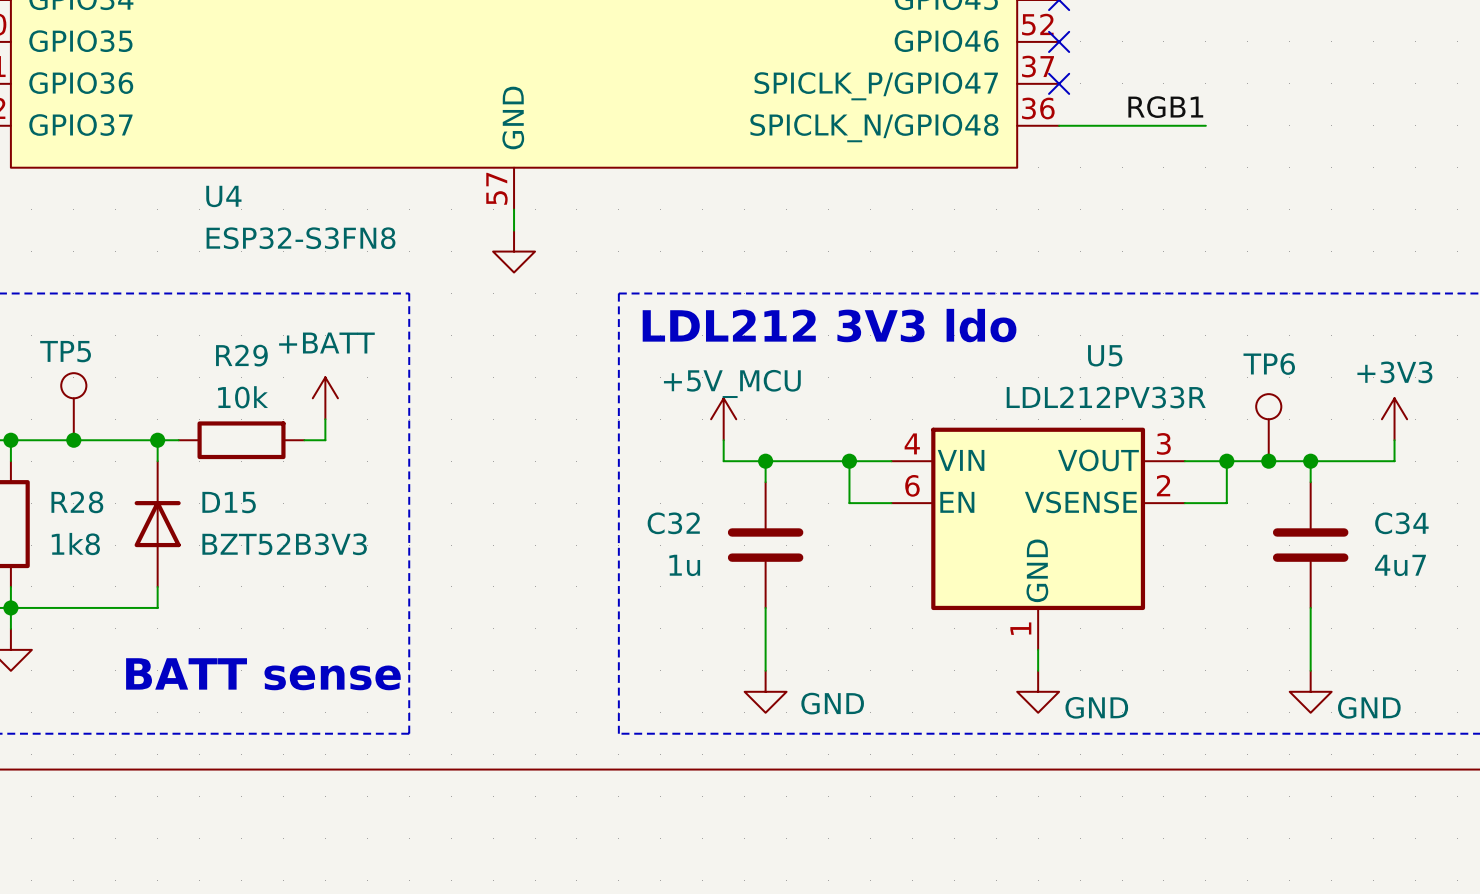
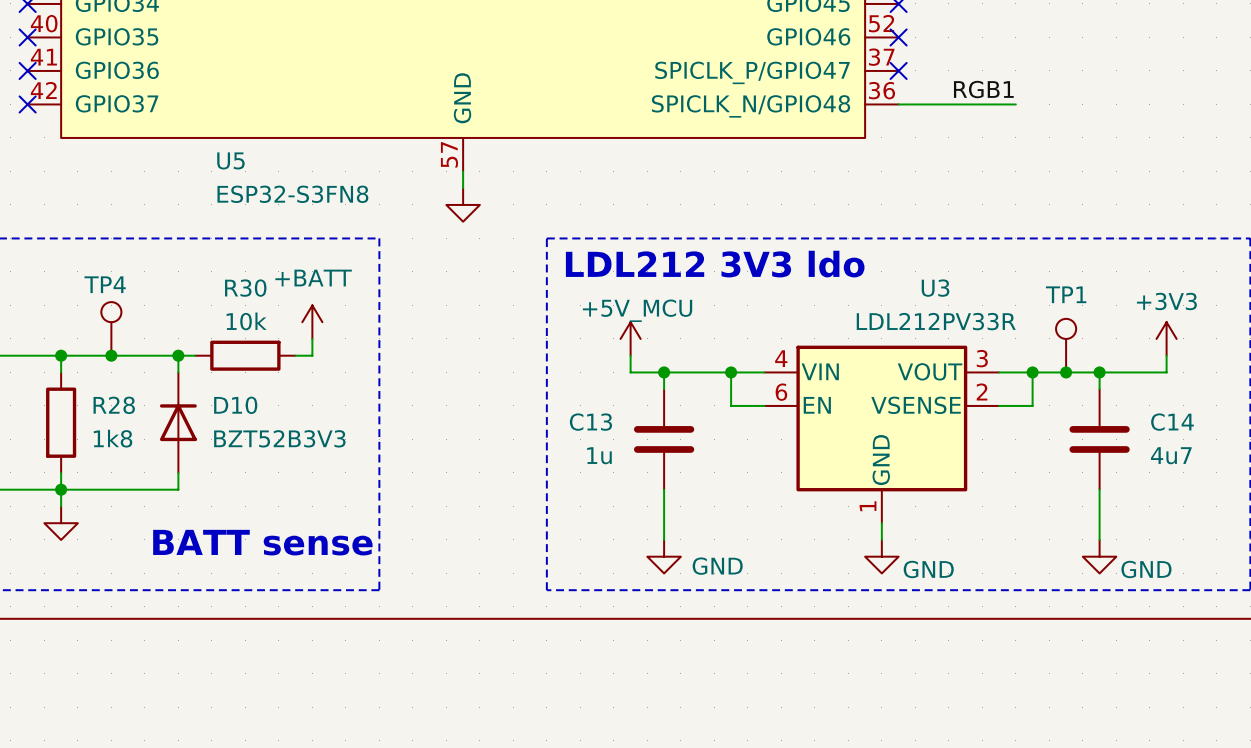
U4 name: U4 (223, 196) -> U5 (230, 160)
TP5 name: TP5 (65, 351) -> TP4 (105, 284)
R29 name: R29 (241, 355) -> R30 (245, 288)
U5 name: U5 (1105, 355) -> U3 (935, 288)
TP6 name: TP6 (1269, 364) -> TP1 (1066, 294)
D15 name: D15 (229, 502) -> D10 (235, 405)
C32 name: C32 (673, 523) -> C13 (590, 422)
C34 name: C34 (1401, 523) -> C14 (1172, 422)

